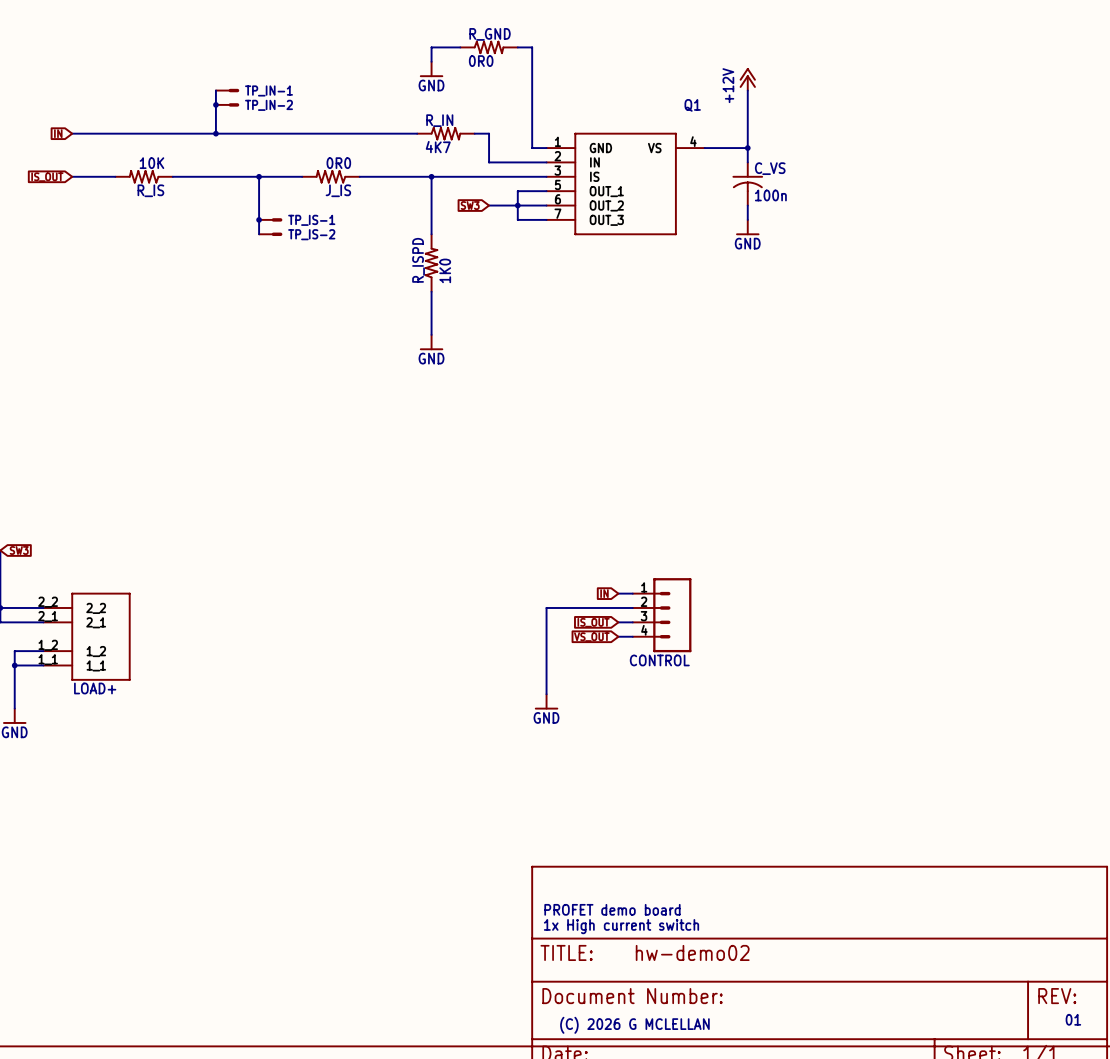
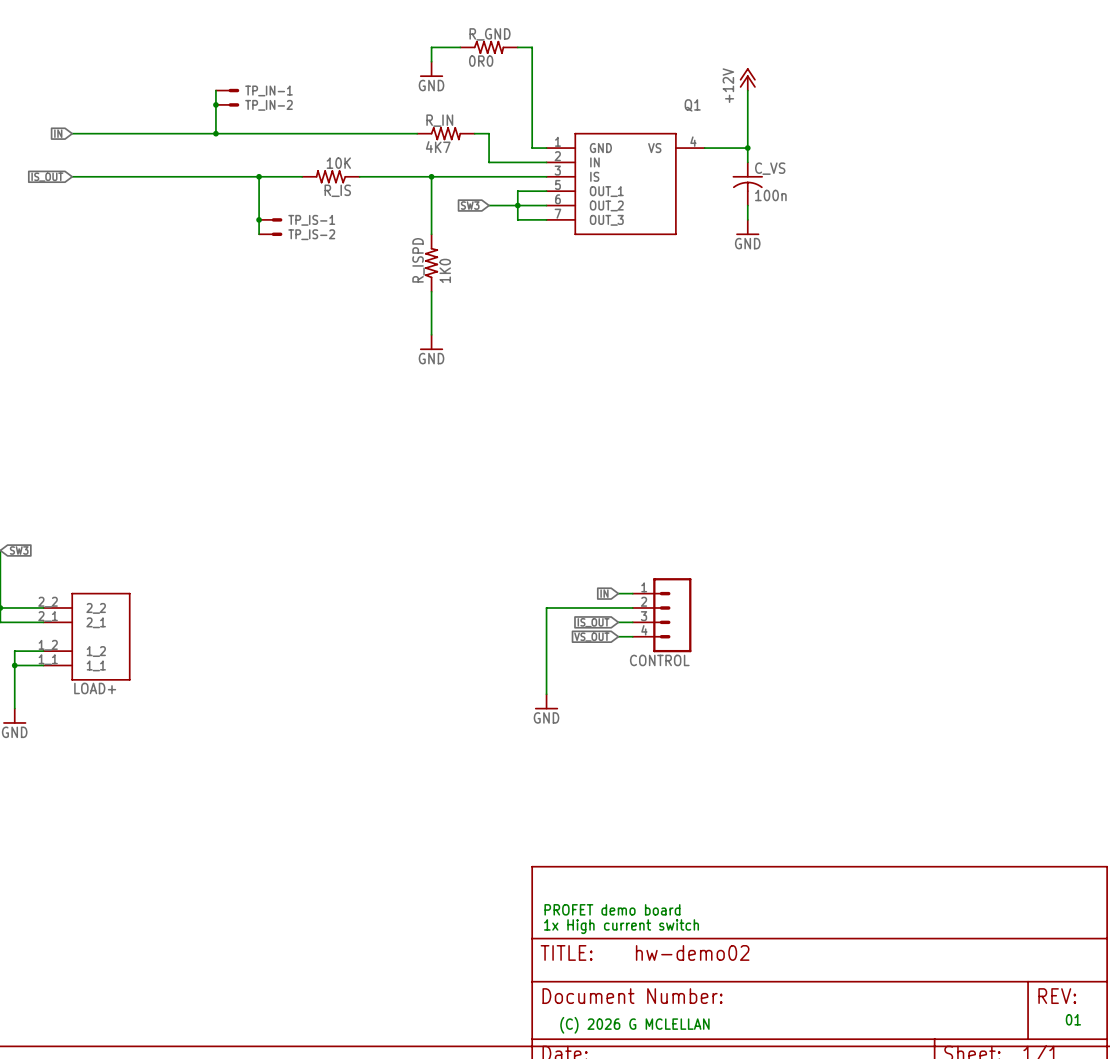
J_IS value: 0R0 (338, 163) -> 10K (338, 163)
R_IS: 10K (144, 176) -> none
J_IS name: J_IS (338, 190) -> R_IS (337, 190)

